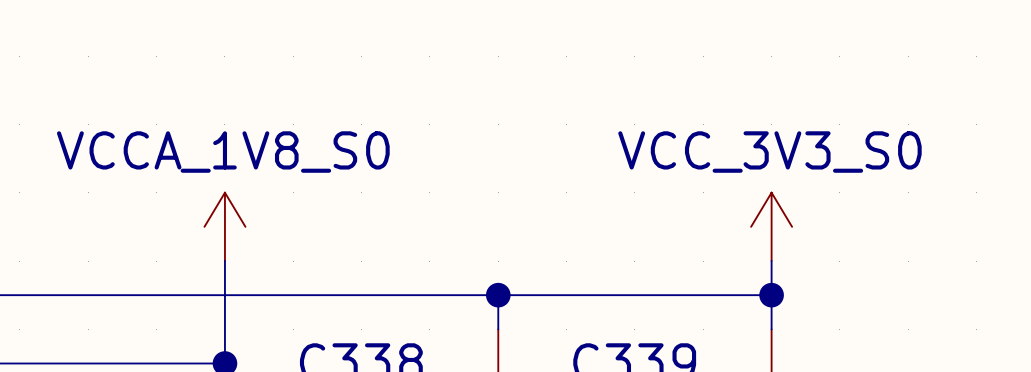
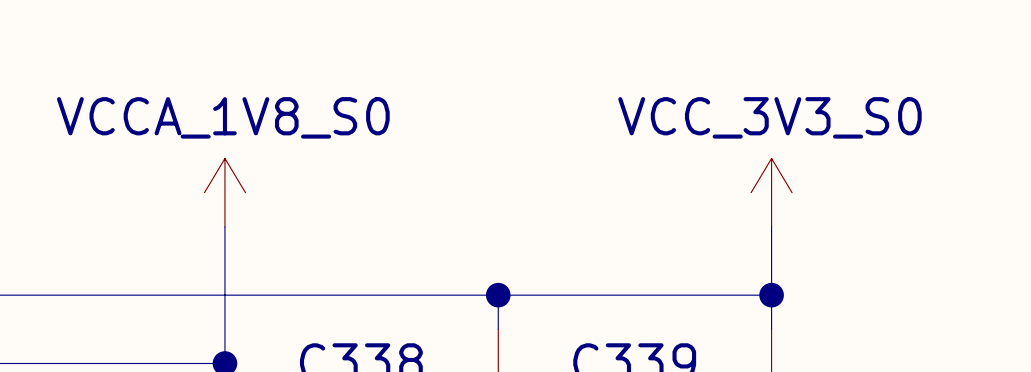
power symbol position: VCCA_1V8_S0 (224, 226) -> VCCA_1V8_S0 (224, 192)
power symbol position: VCC_3V3_S0 (771, 226) -> VCC_3V3_S0 (771, 192)

